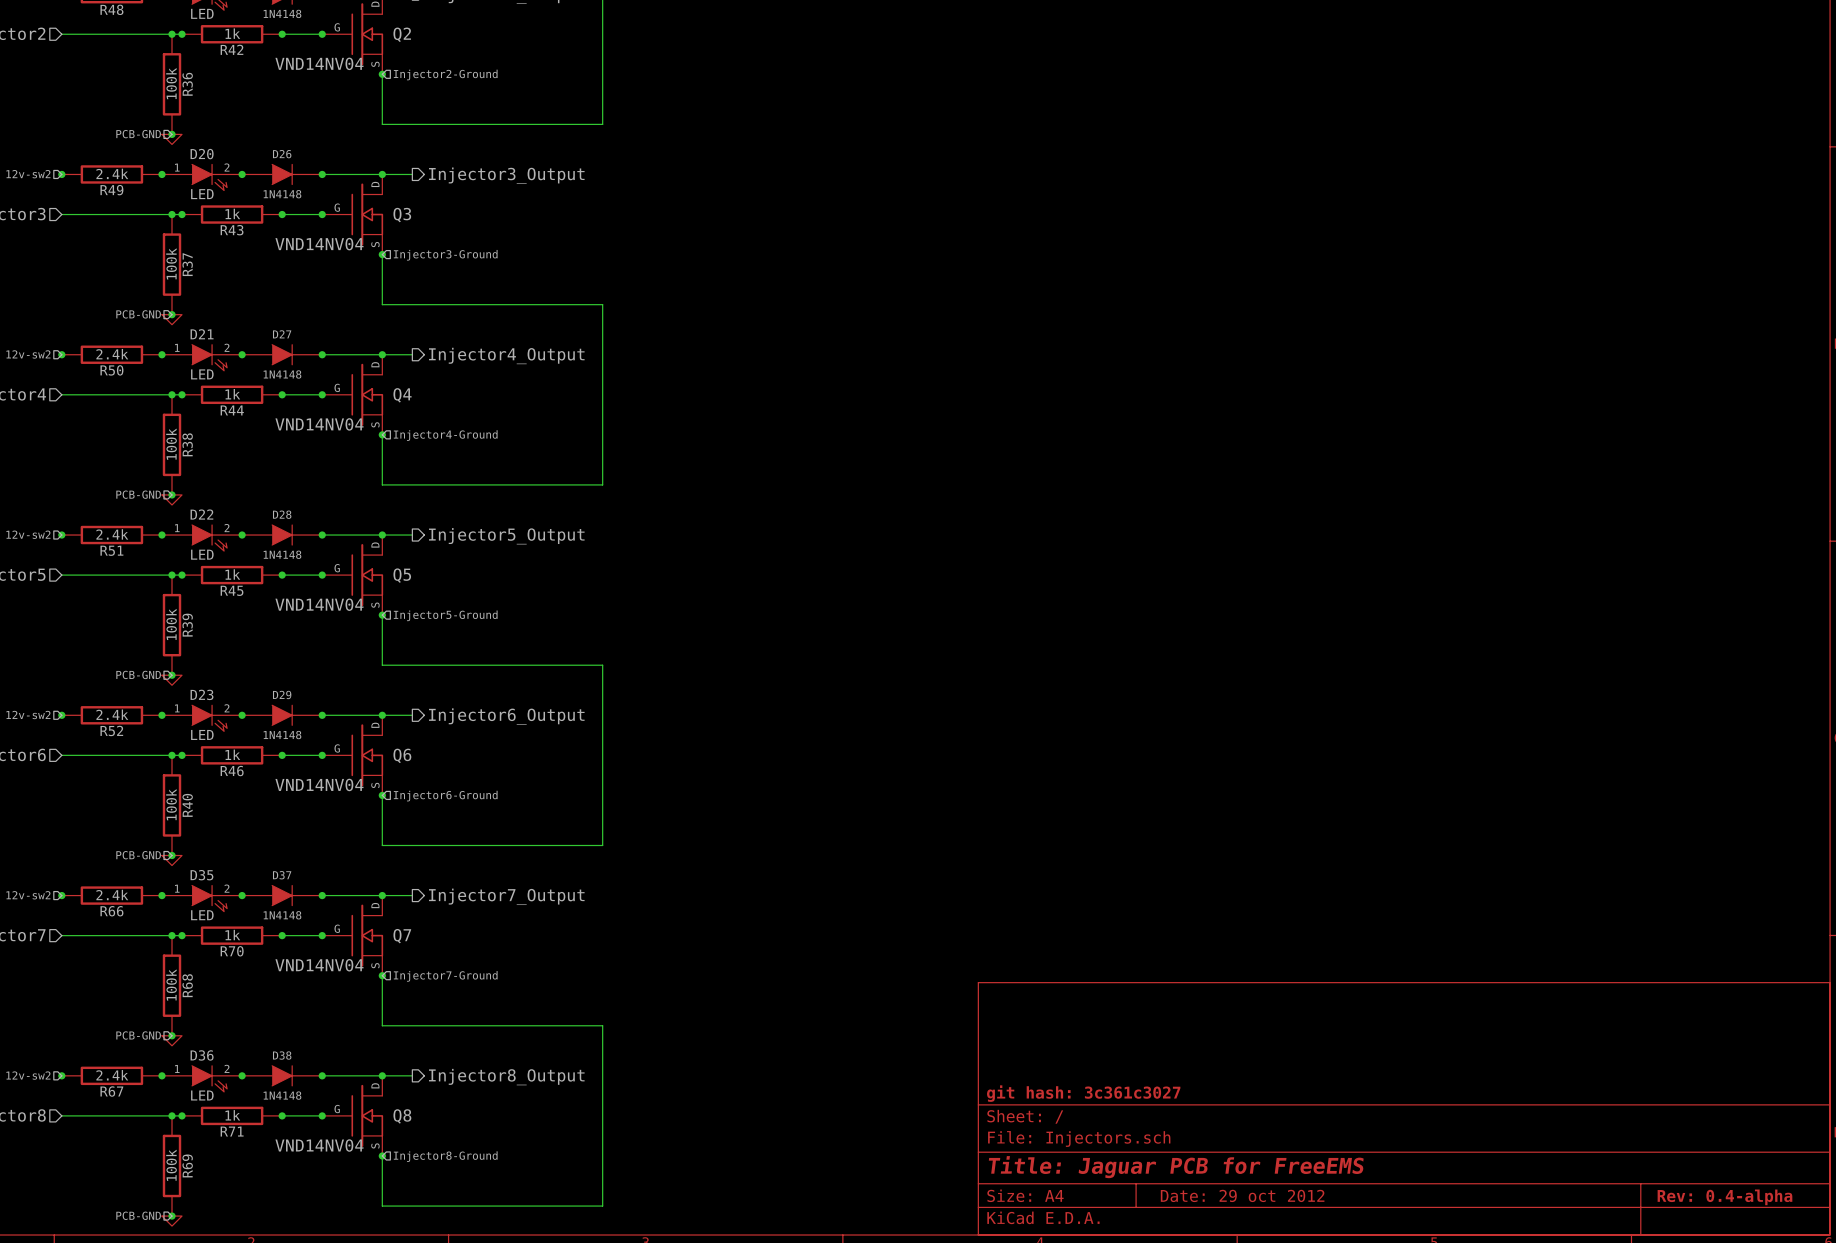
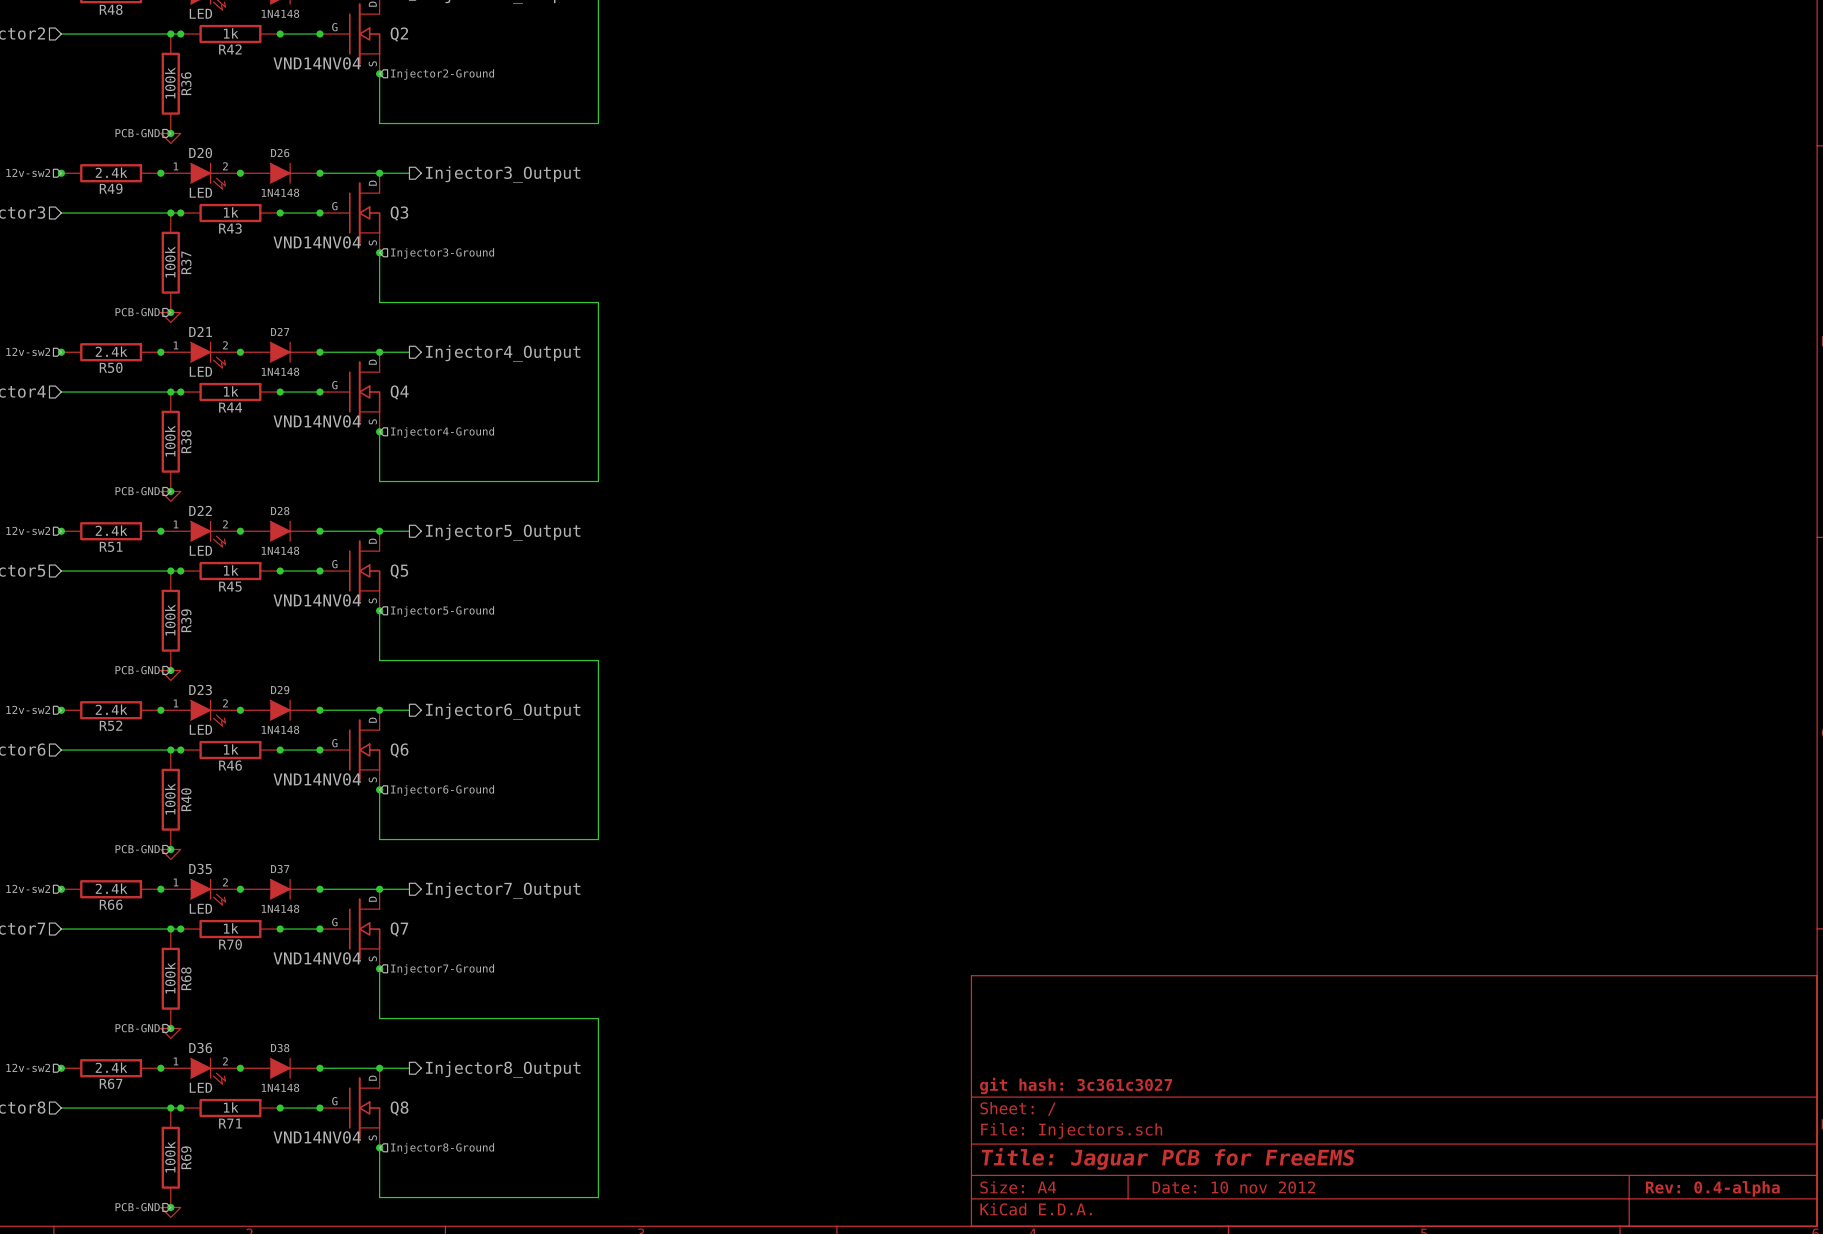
title block: Date: 29 oct 2012 (1242, 1195) -> Date: 10 nov 2012 (1233, 1187)

